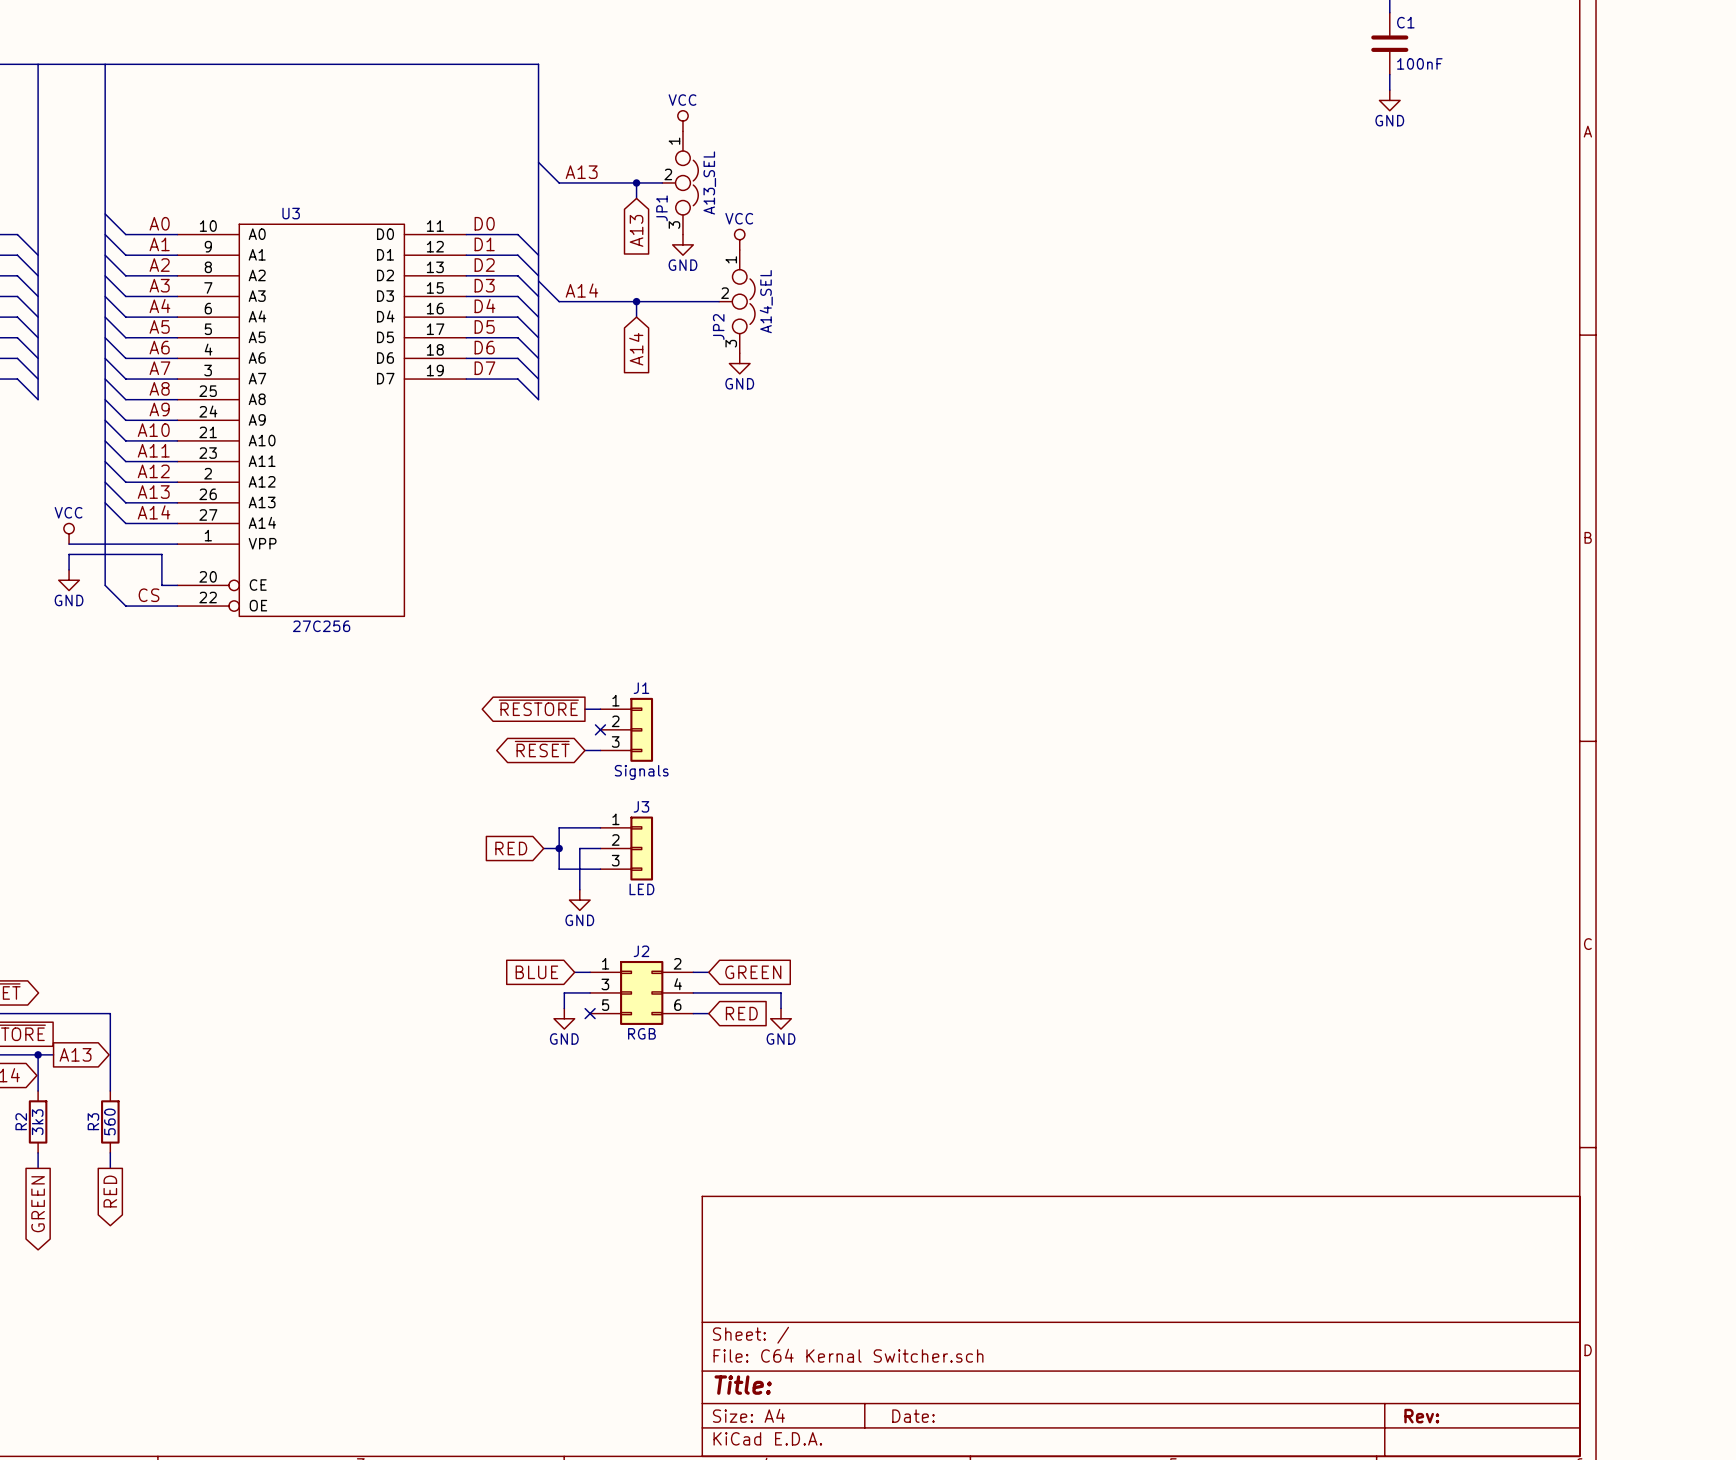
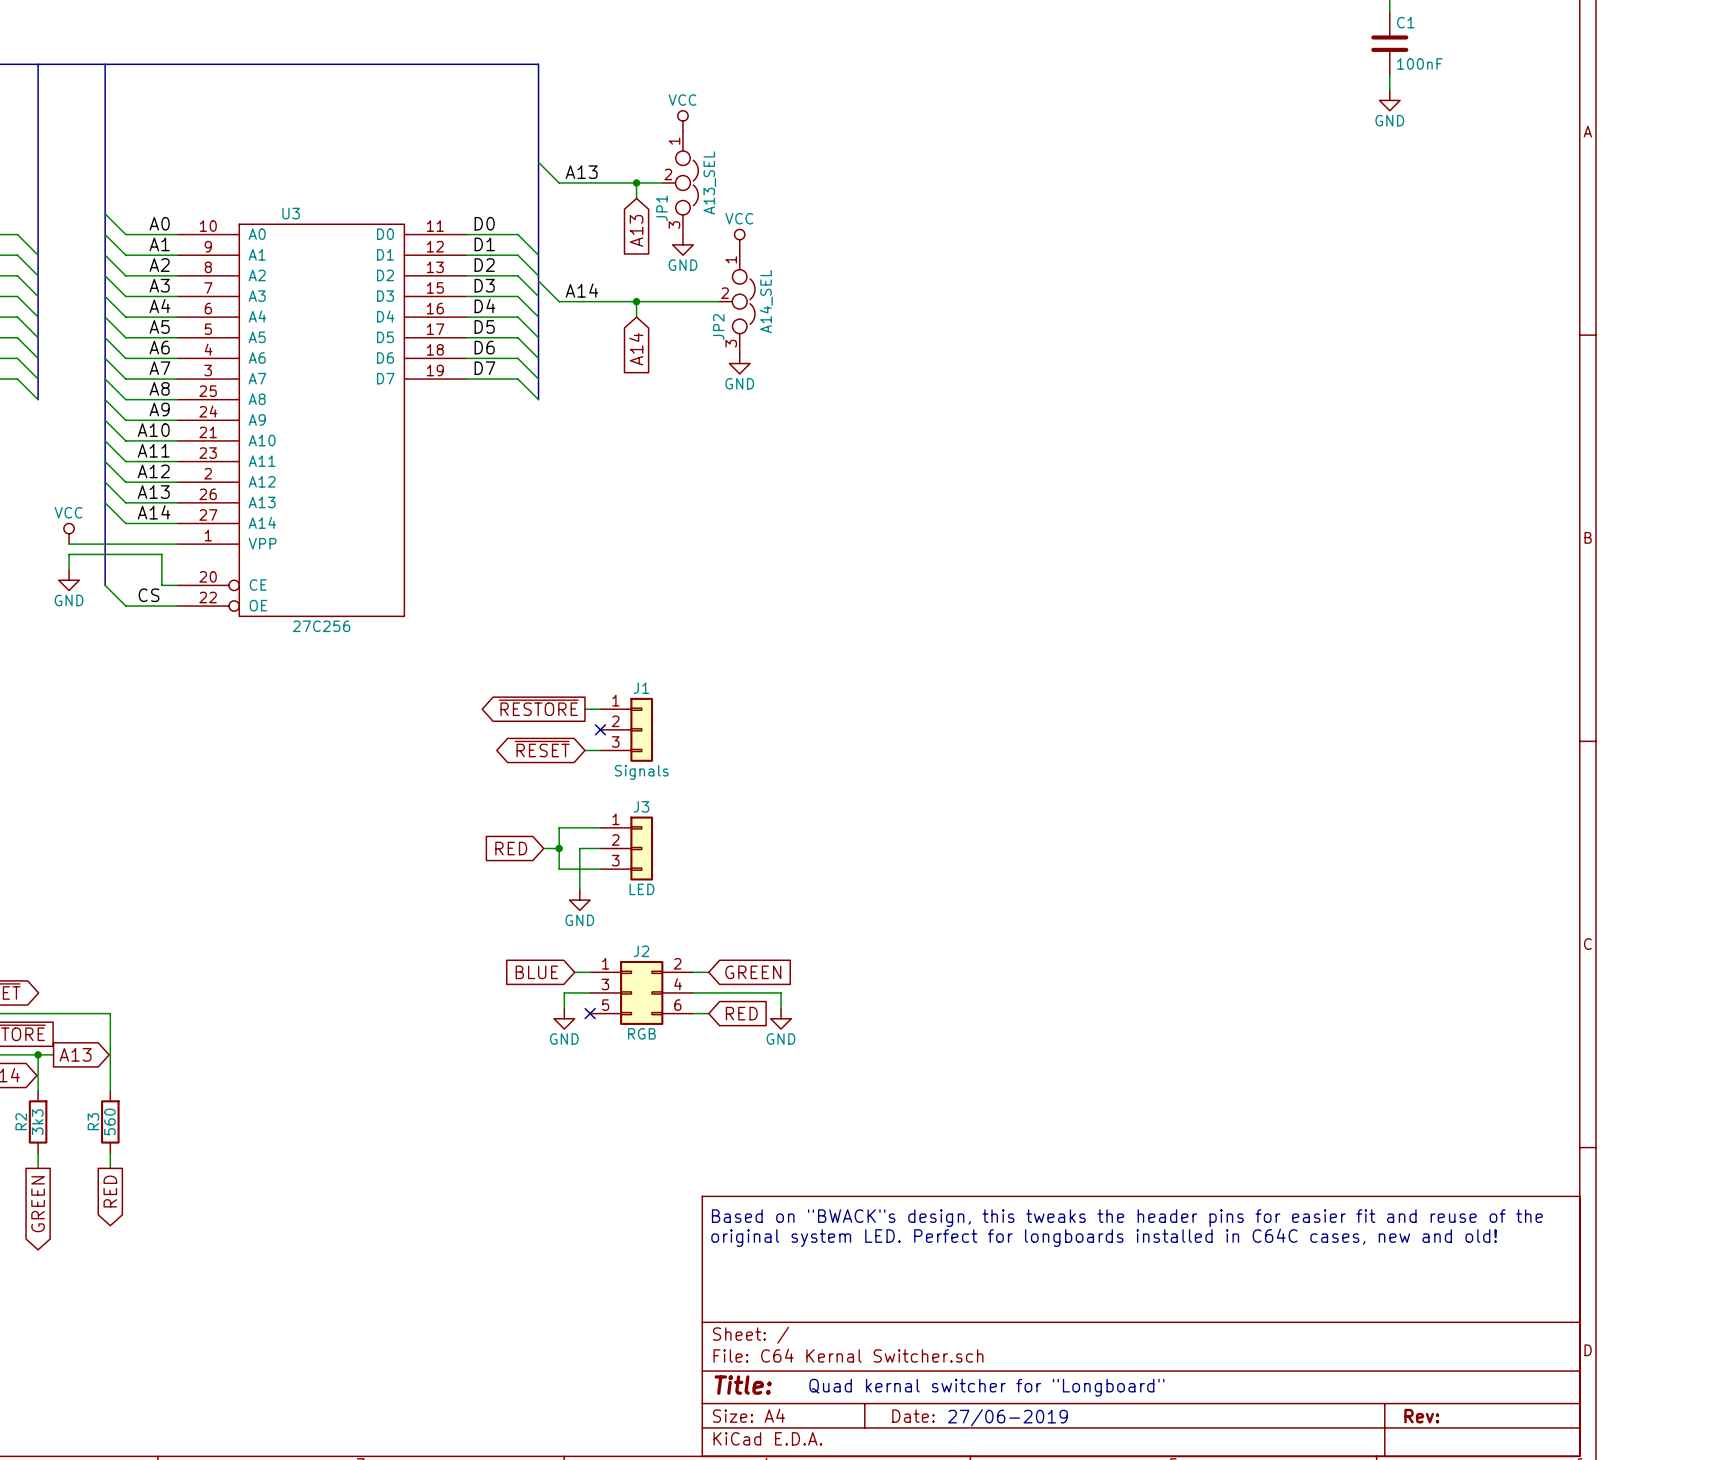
text: none -> Based on "BWACK"s design, this tweaks the header pins for easier fit and reuse of the (1127, 1218)
text: none -> original system LED. Perfect for longboards installed in C64C cases, new and old! (1104, 1237)
text: none -> Quad kernal switcher for "Longboard" (986, 1387)
text: none -> 27/06-2019 (1007, 1417)

